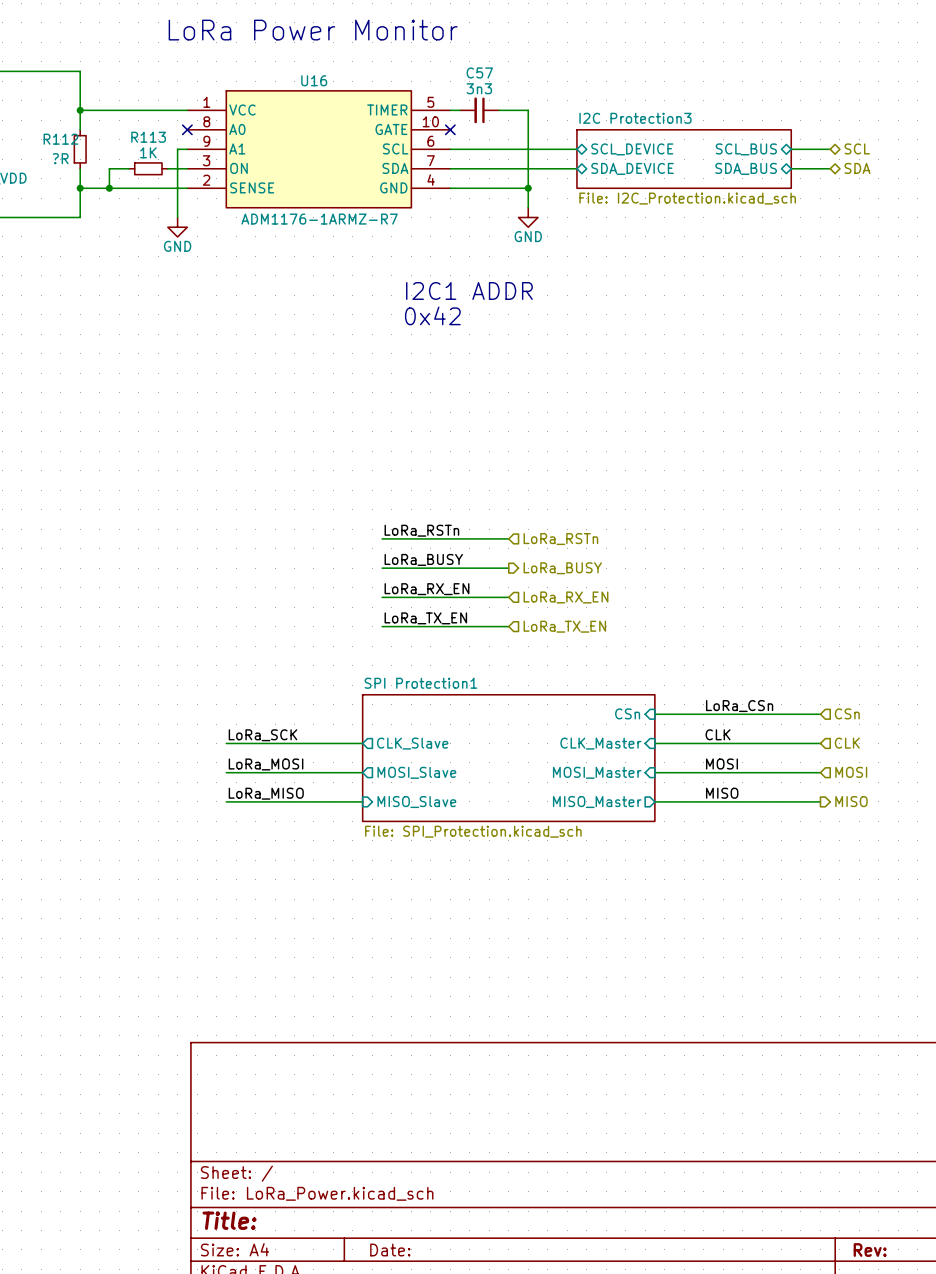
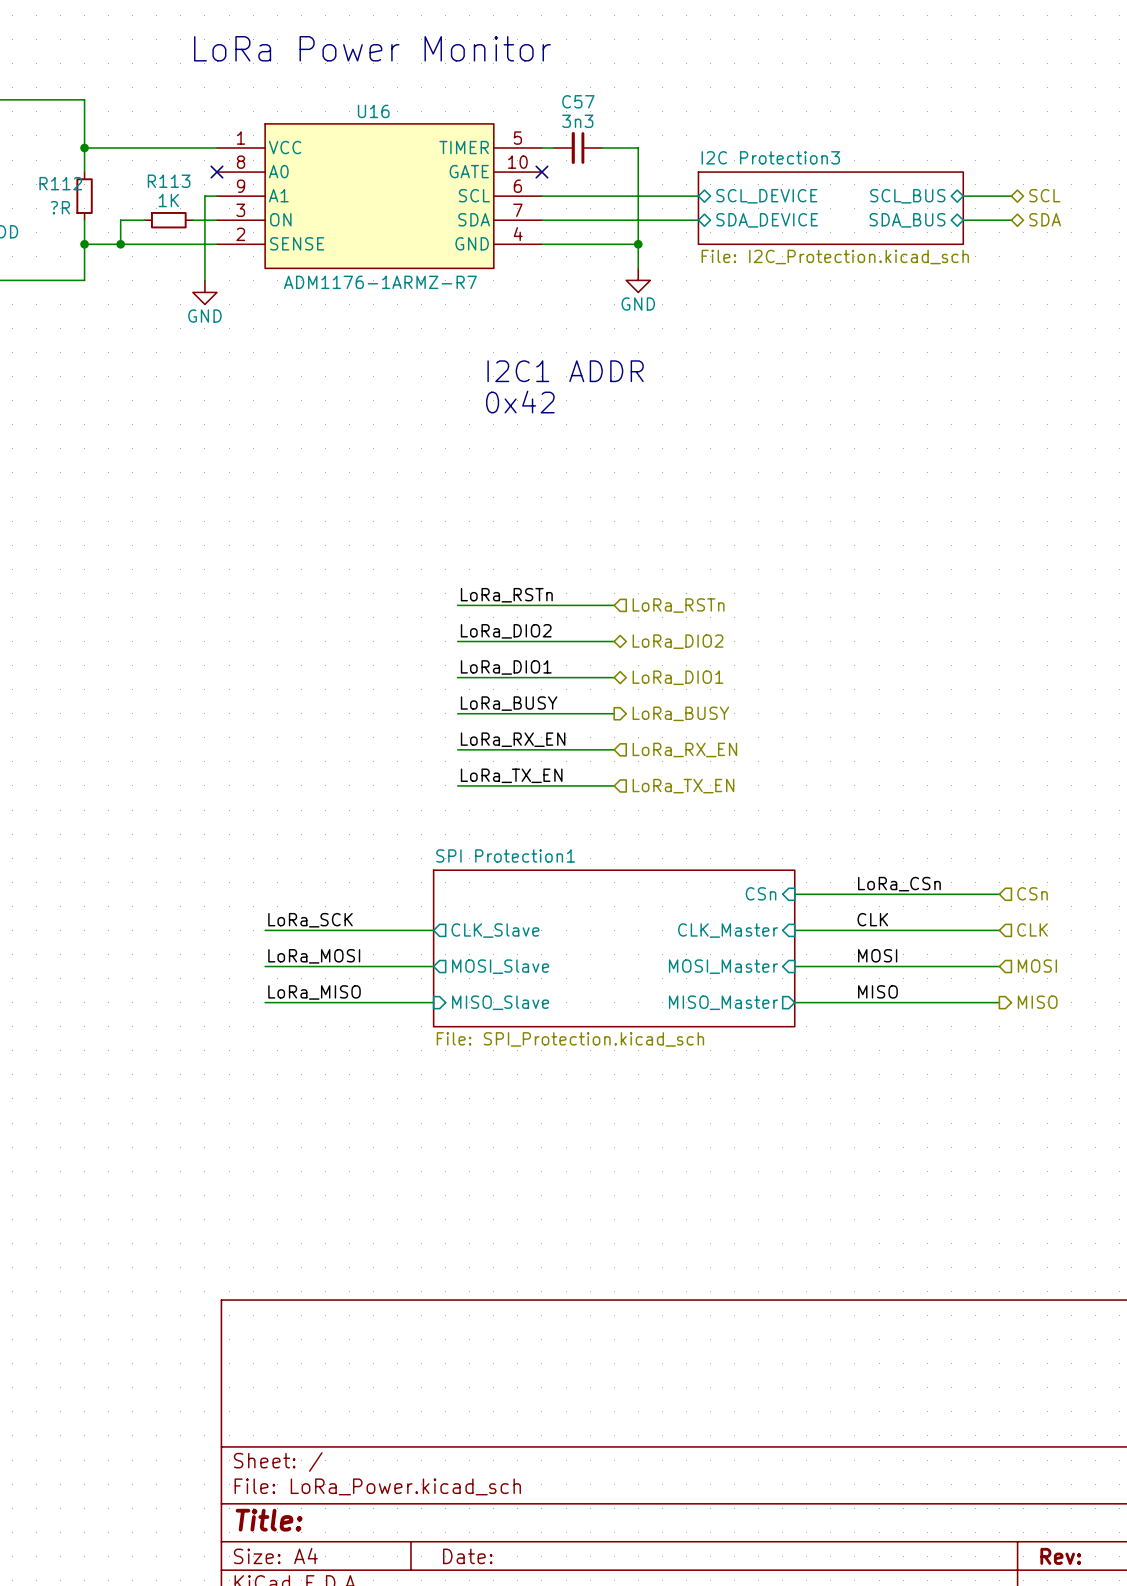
label: none -> LoRa_RSTn (506, 595)
wire: none -> (457, 605) (614, 605)
hierarchical label: none -> LoRa_RSTn (678, 605)
label: none -> LoRa_DIO2 (506, 631)
wire: none -> (457, 641) (614, 641)
hierarchical label: none -> LoRa_DIO2 (678, 641)
label: LoRa_RSTn (421, 530) -> LoRa_DIO1 (506, 667)
hierarchical label shape: input (560, 539) -> bidirectional (678, 677)
hierarchical label: LoRa_RSTn (560, 539) -> LoRa_DIO1 (678, 677)

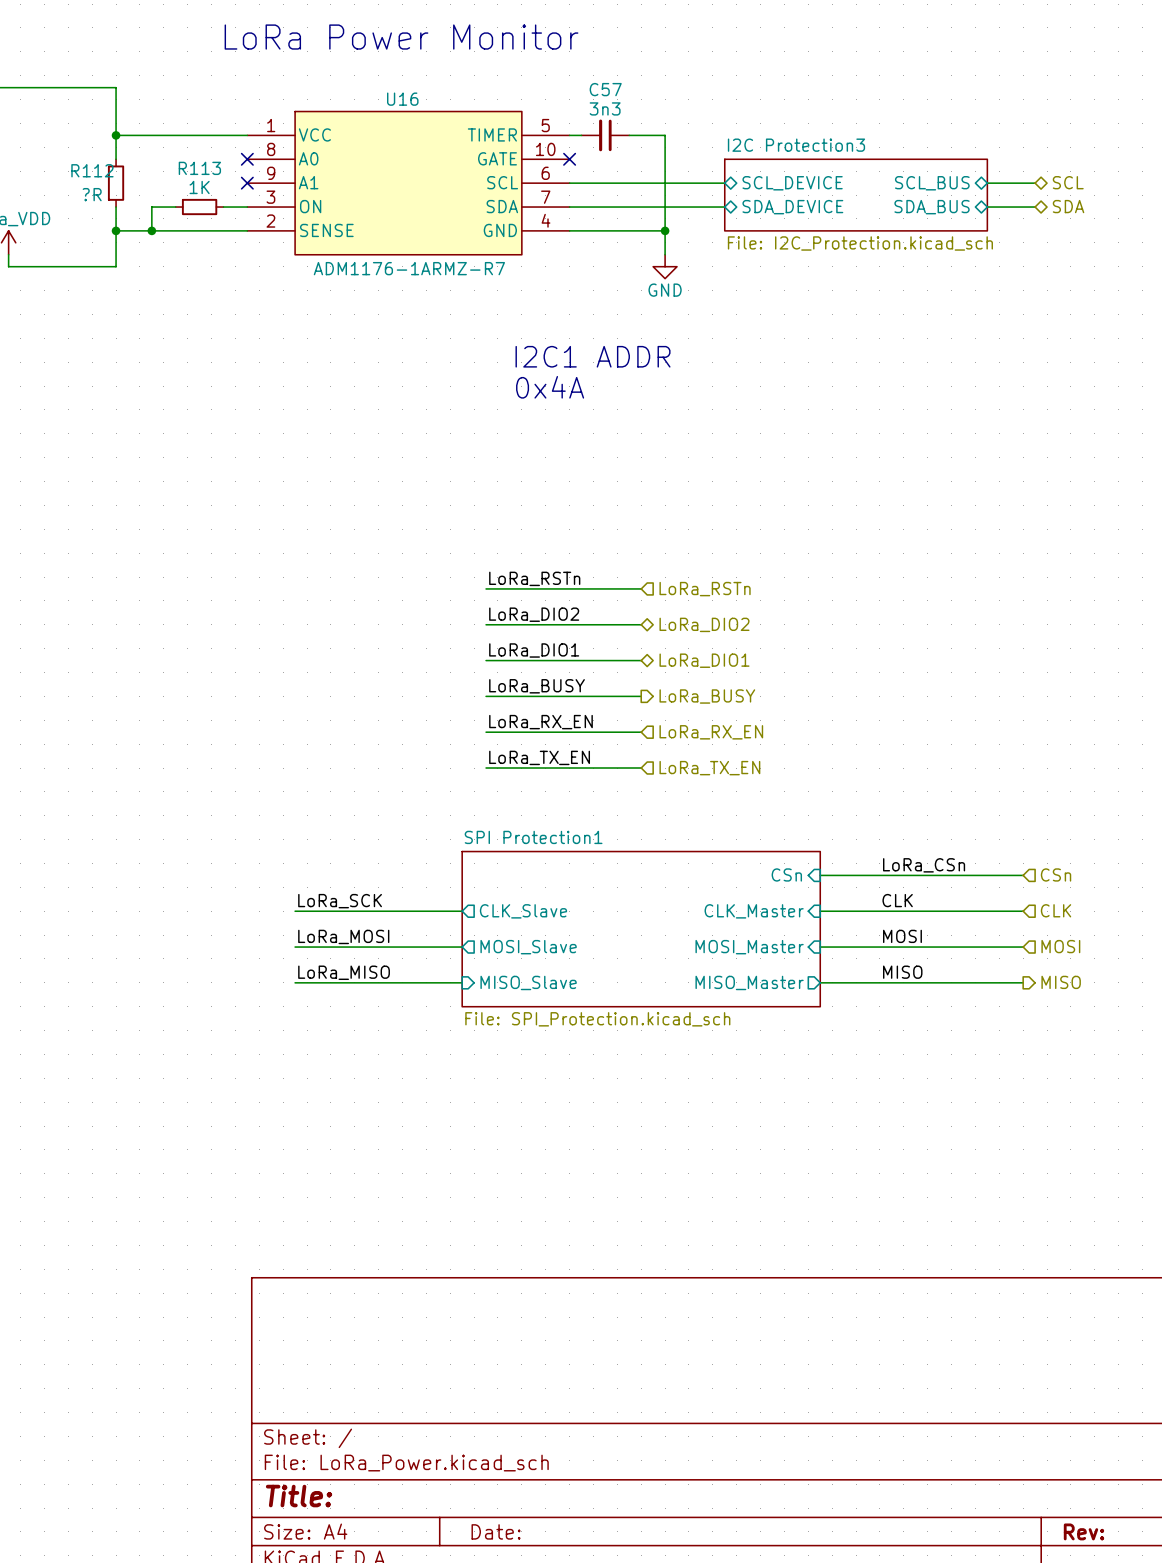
wire: (216, 196) (204, 196) (204, 280) -> none
no-connect mark: none -> (247, 183)
power symbol: GND (204, 292) -> none
text: 0x42 (520, 402) -> 0x4A (550, 387)

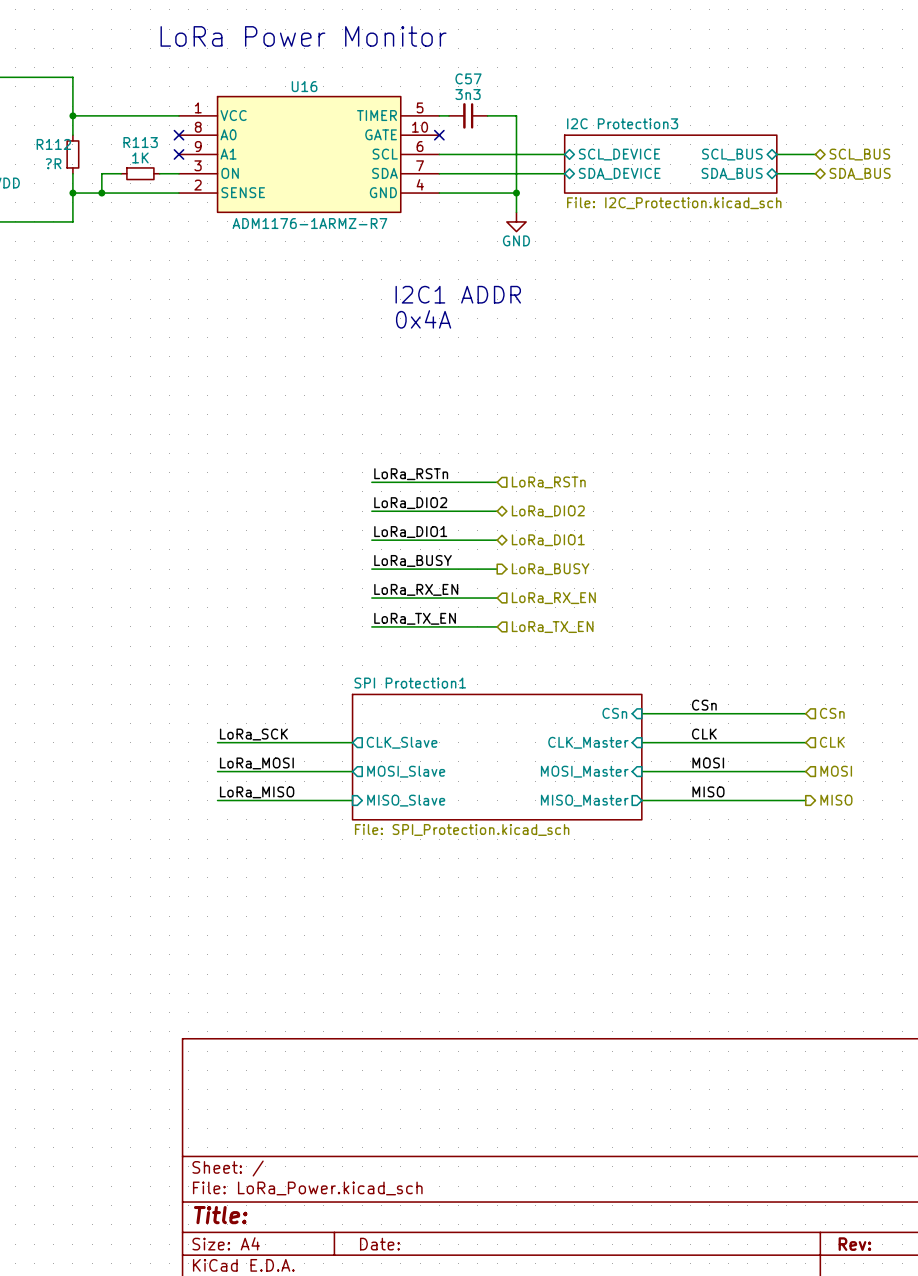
hierarchical label: SCL (1068, 182) -> SCL_BUS (859, 154)
hierarchical label: SDA (1068, 206) -> SDA_BUS (860, 173)
label: LoRa_CSn (924, 865) -> CSn (704, 705)

